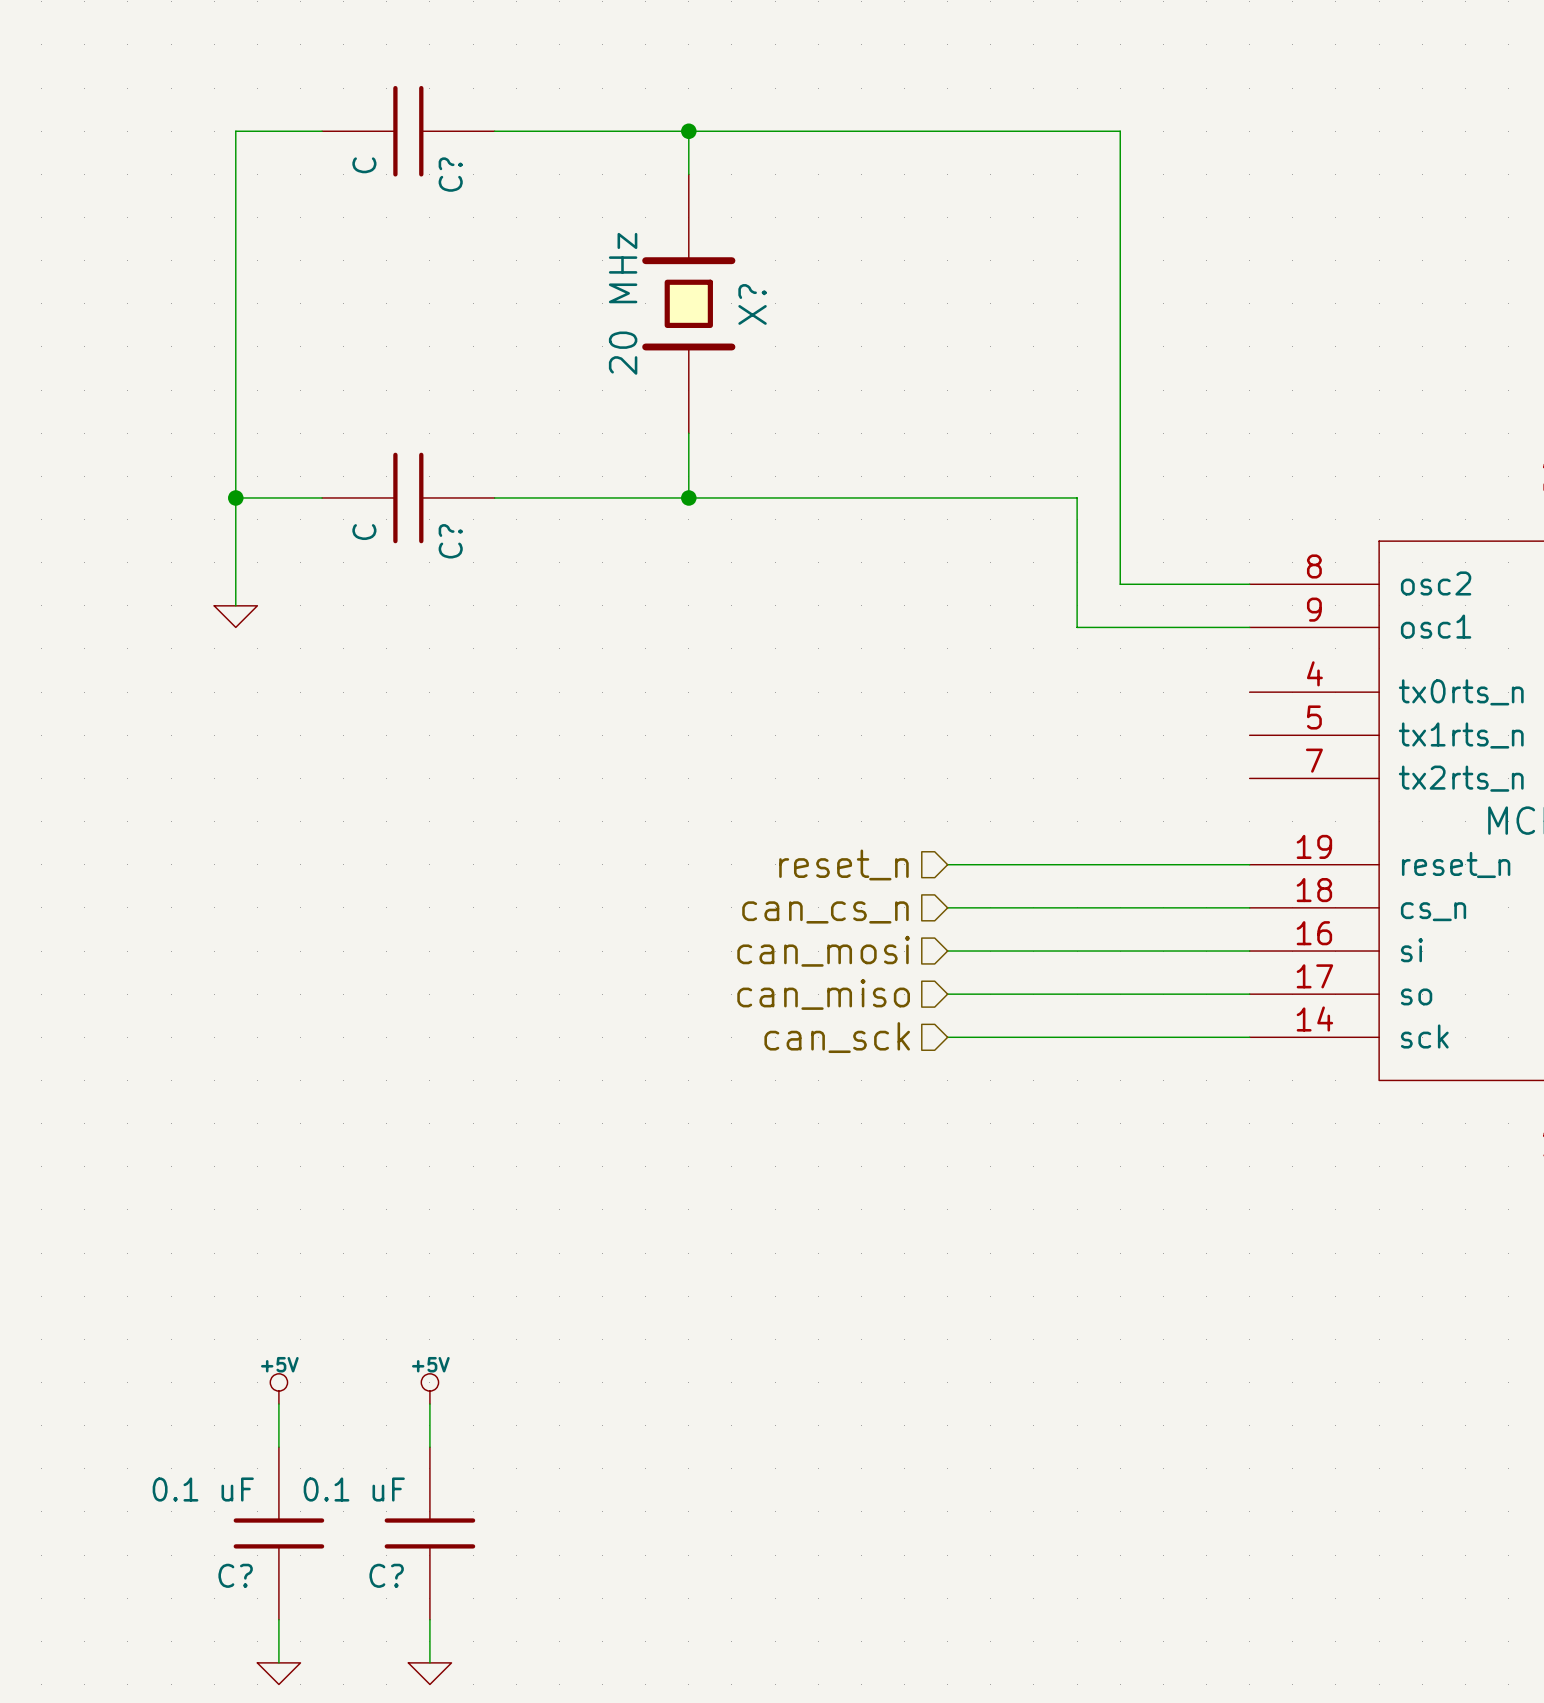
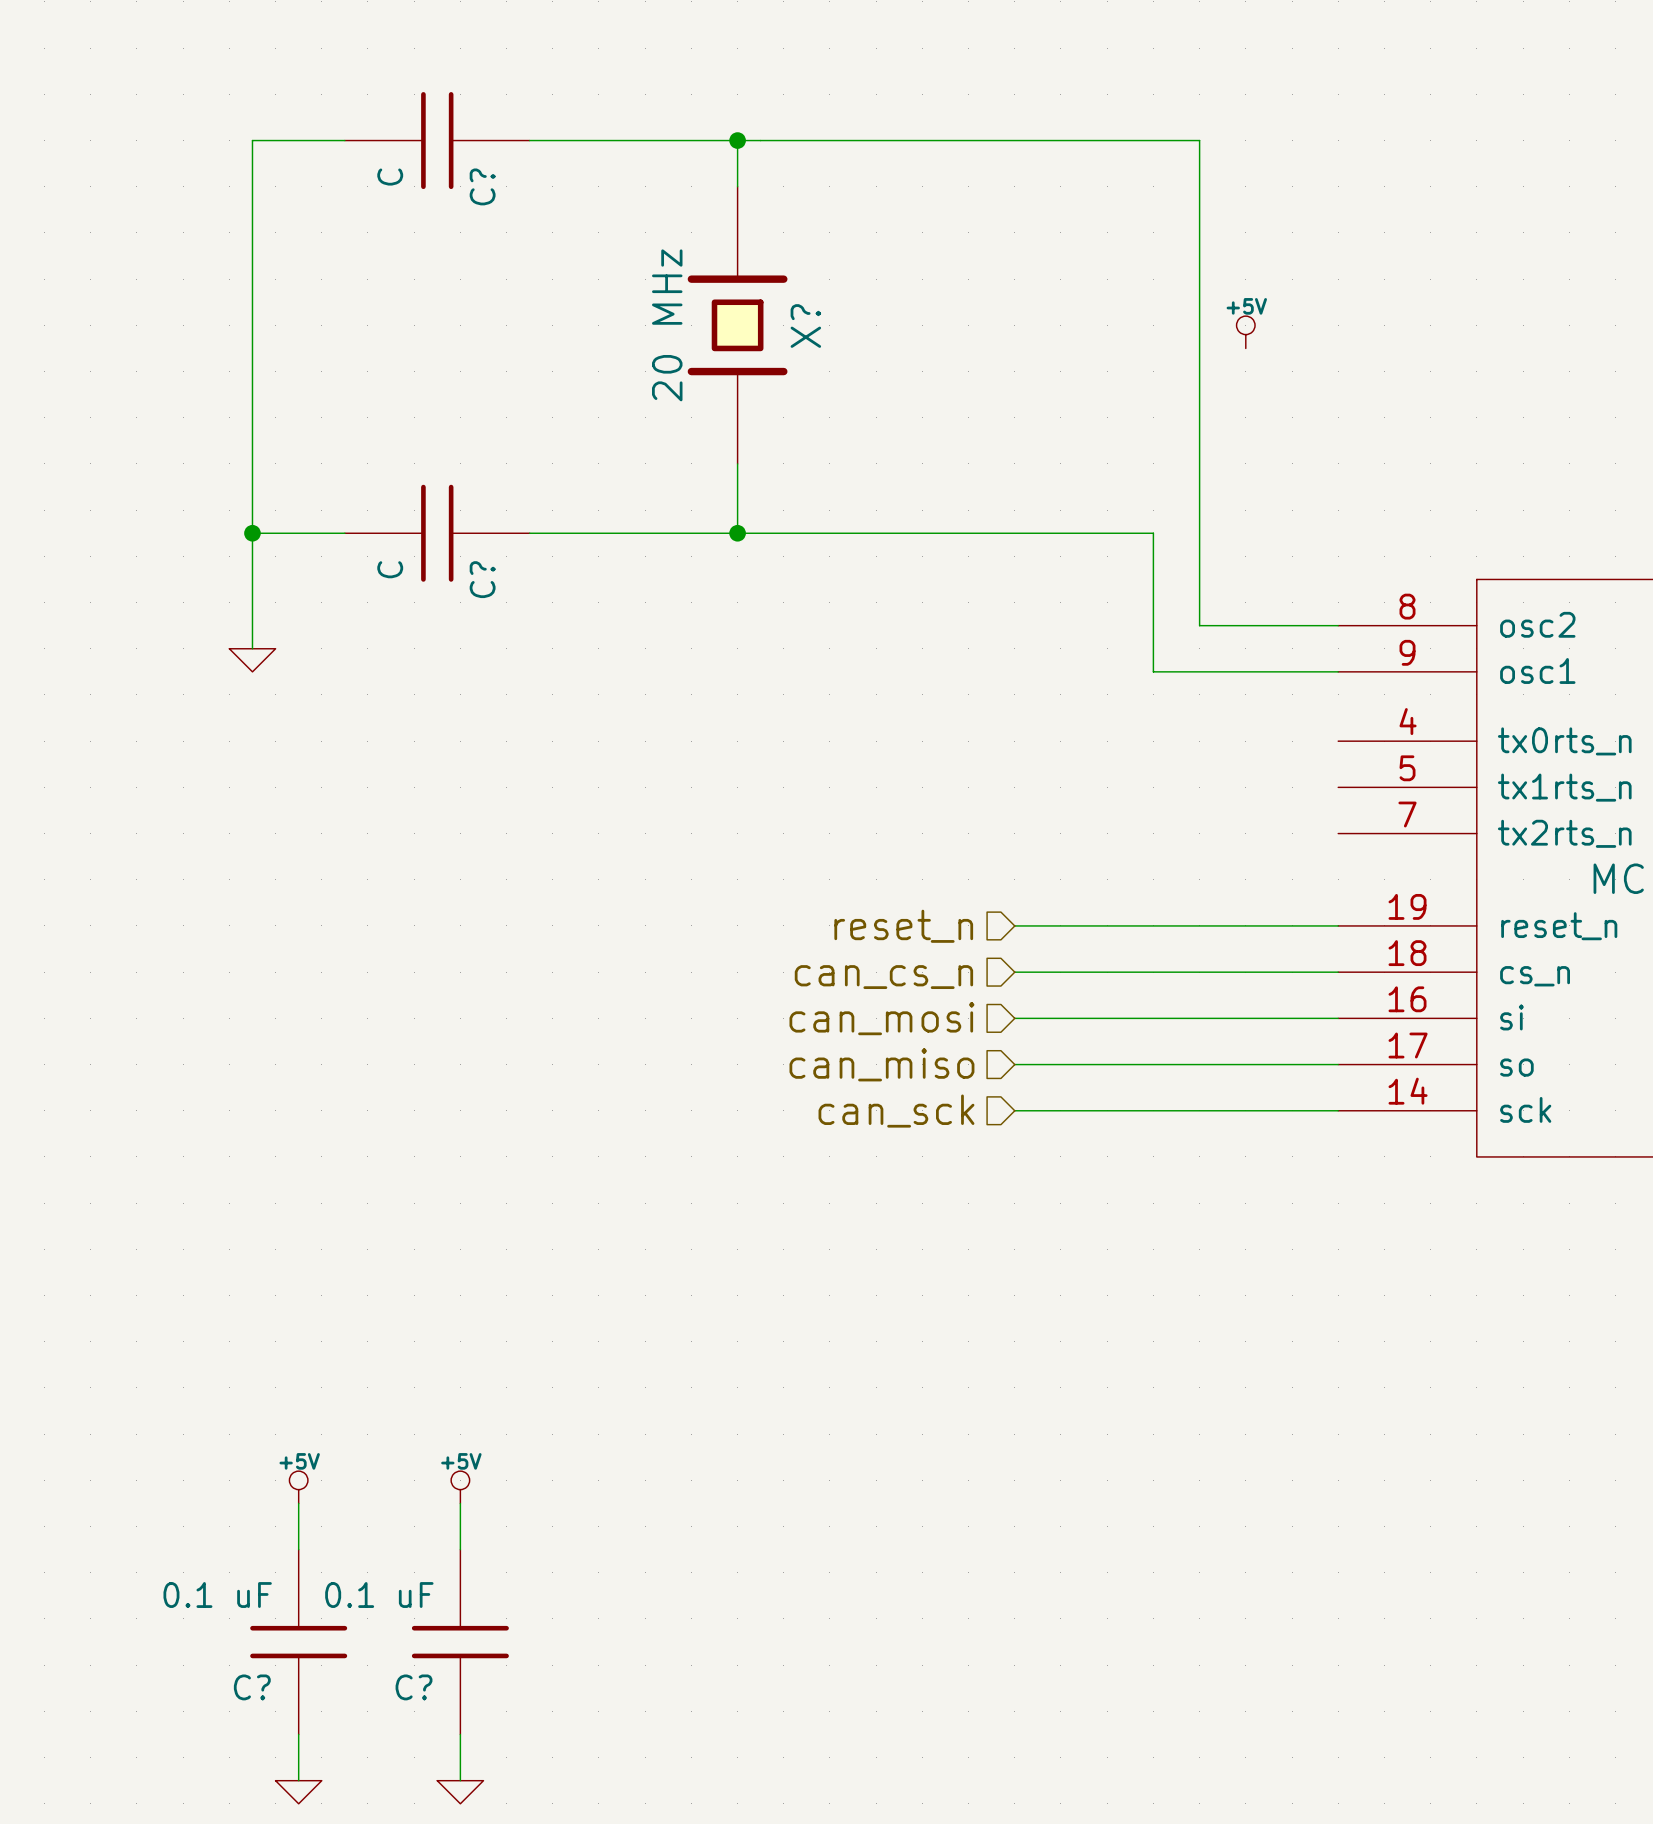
power symbol: none -> +5V (1245, 332)

